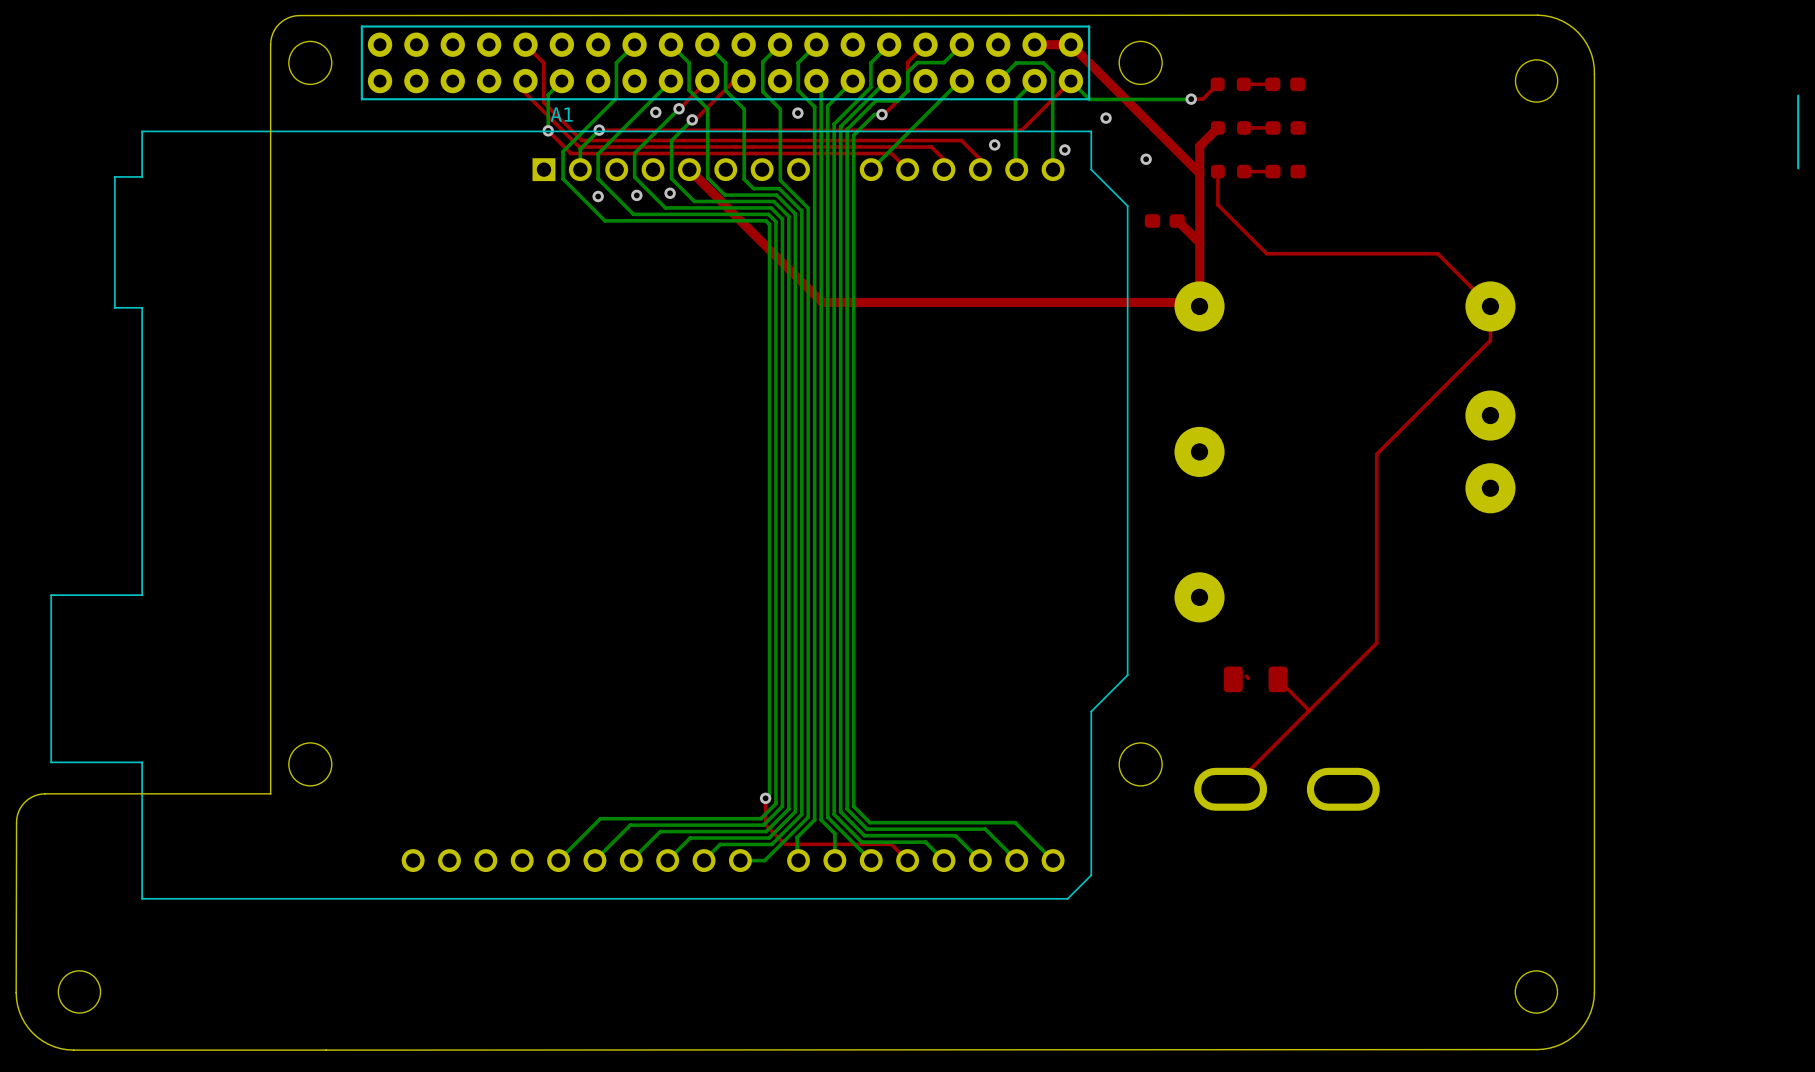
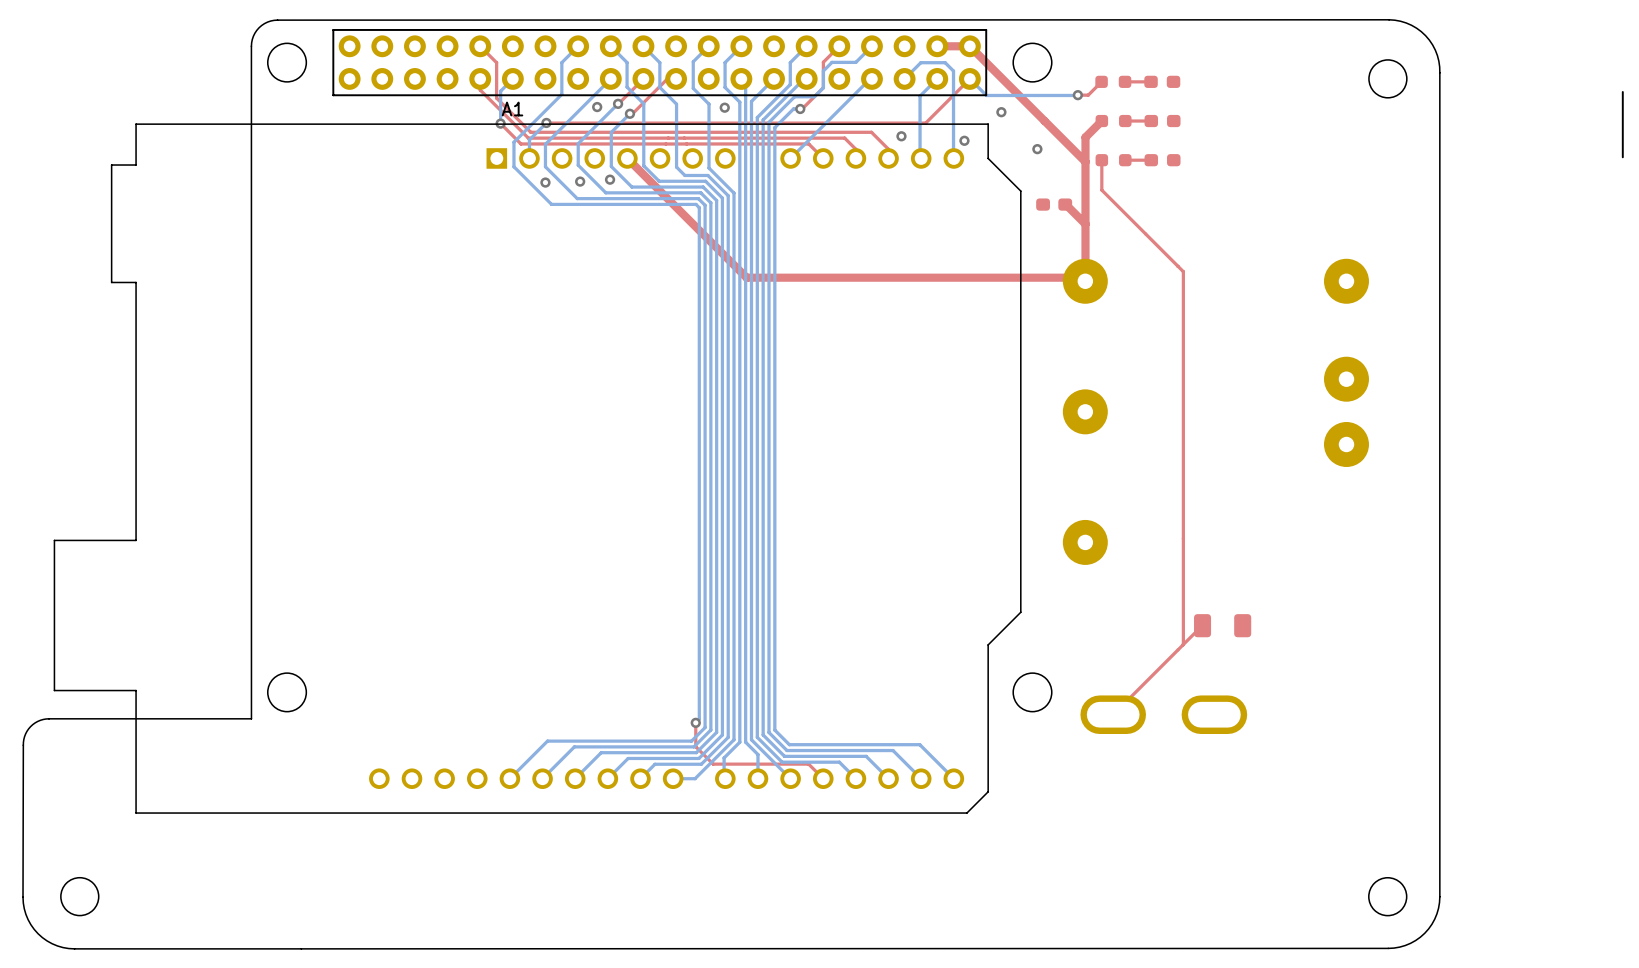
top track: (1266, 253) (1437, 253) (1490, 306) (1490, 340) (1376, 454) (1376, 643) (1329, 690) -> (1145, 233) (1183, 271) (1183, 644)
top track: (1246, 676) (1248, 678) -> none
part position: (1255, 679) -> (1222, 625)
top track: (1278, 679) (1308, 711) -> none

